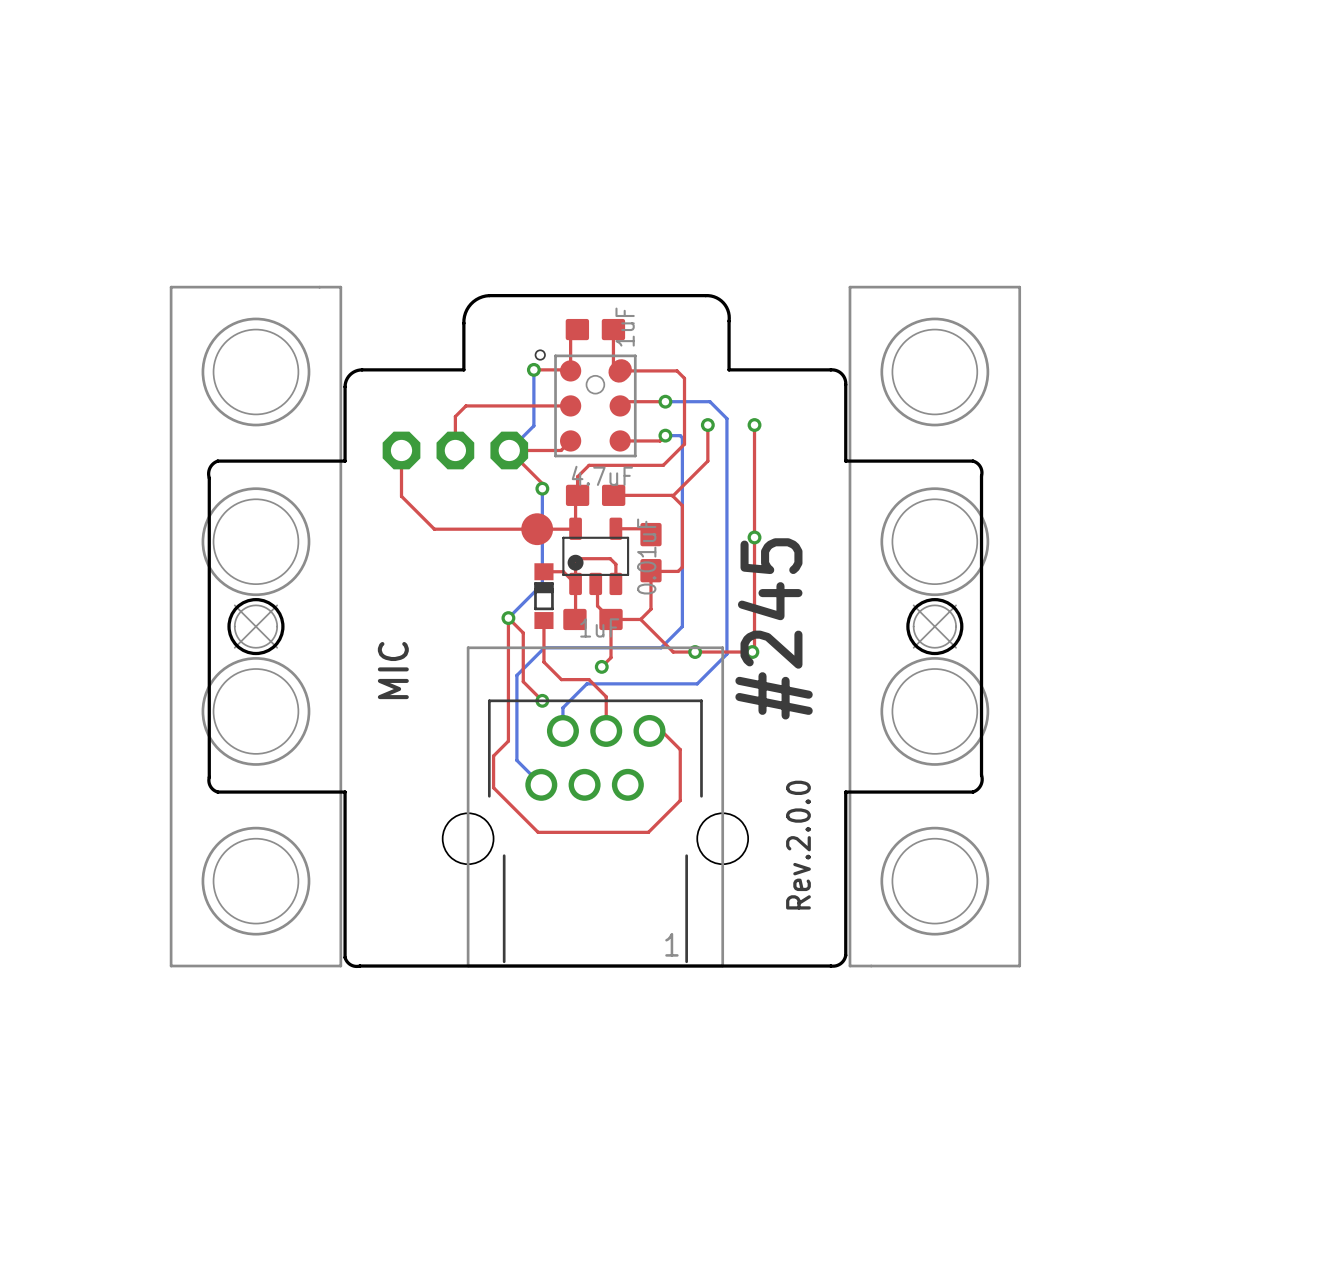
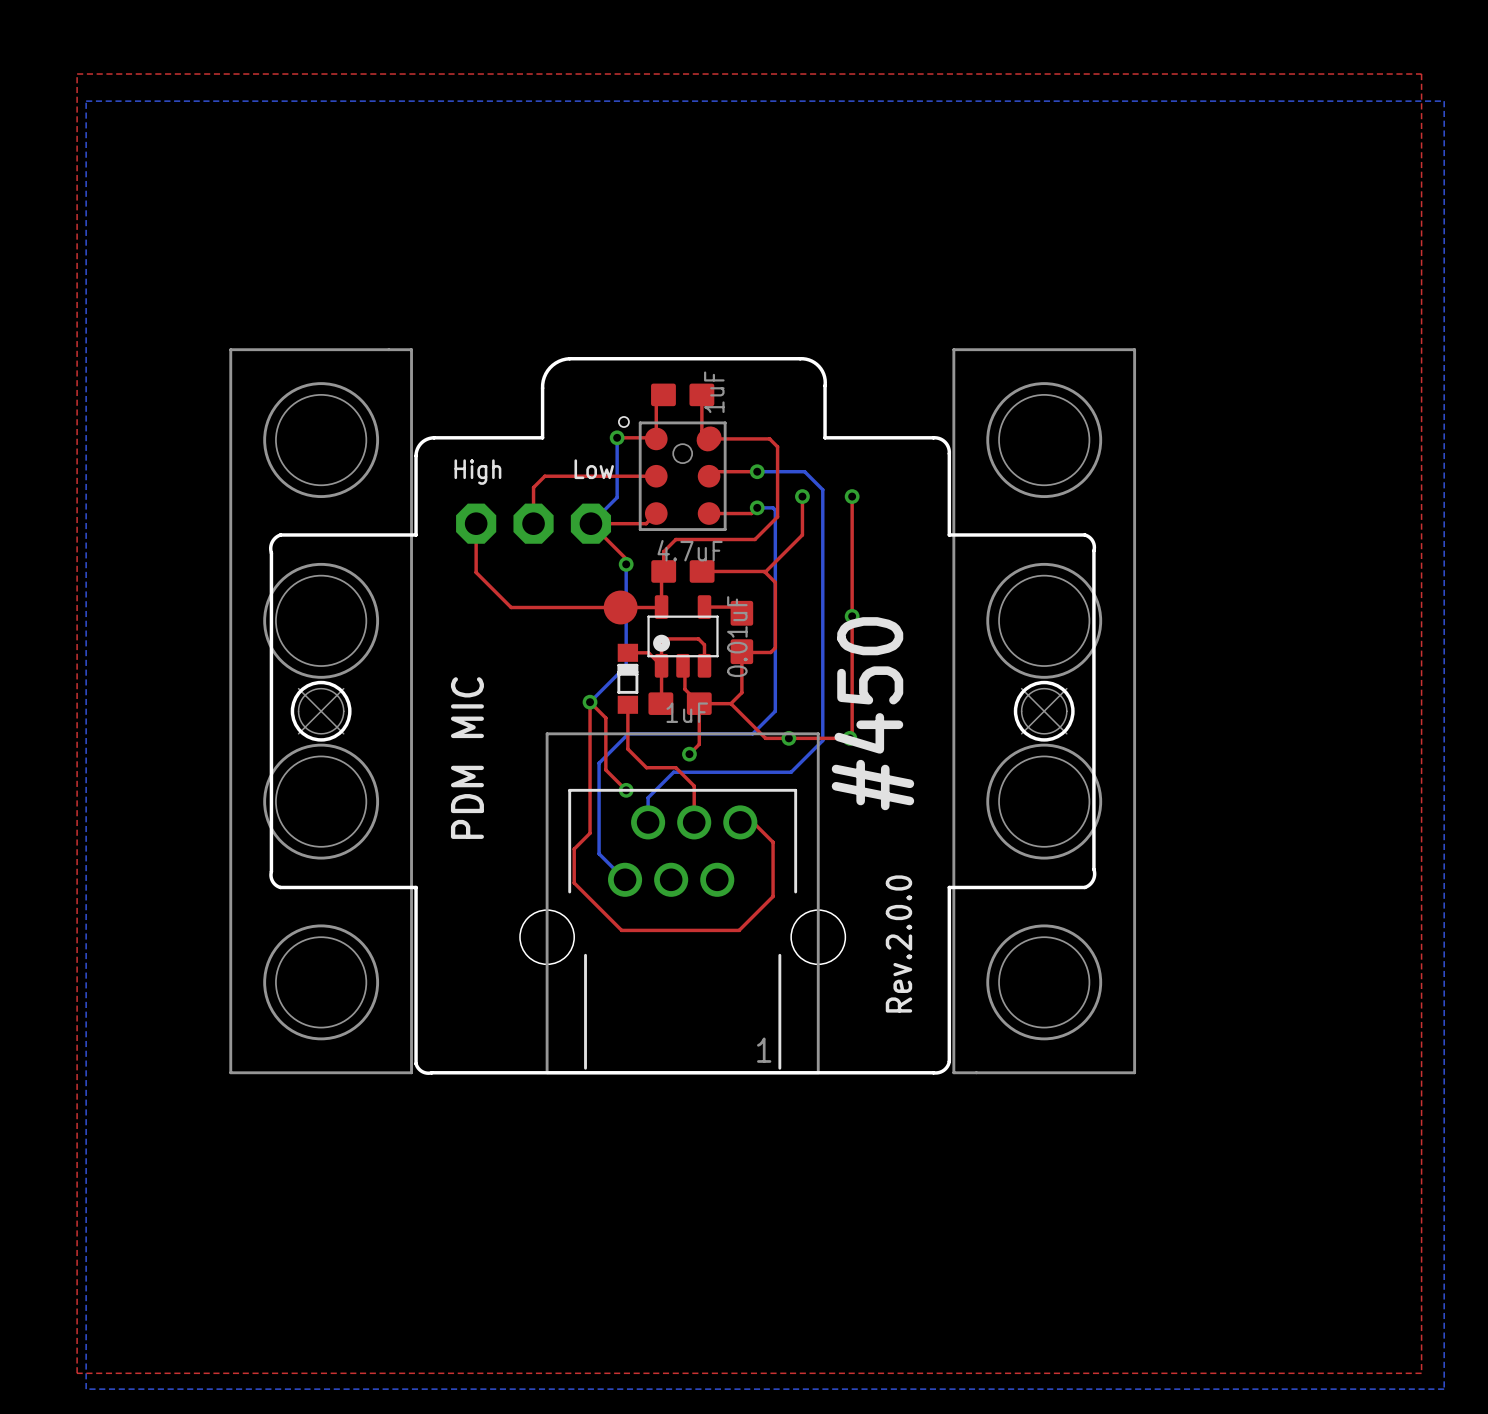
top zone outline: none -> (77, 74) (1421, 74) (1421, 1373) (77, 1373) (77, 74)
bottom zone outline: none -> (86, 101) (1444, 101) (1444, 1389) (86, 1389) (86, 101)
text: none -> Low (594, 469)
text: none -> High (477, 472)
text: #245 (774, 628) -> #450 (872, 713)
text: MIC (393, 670) -> PDM MIC (467, 758)

